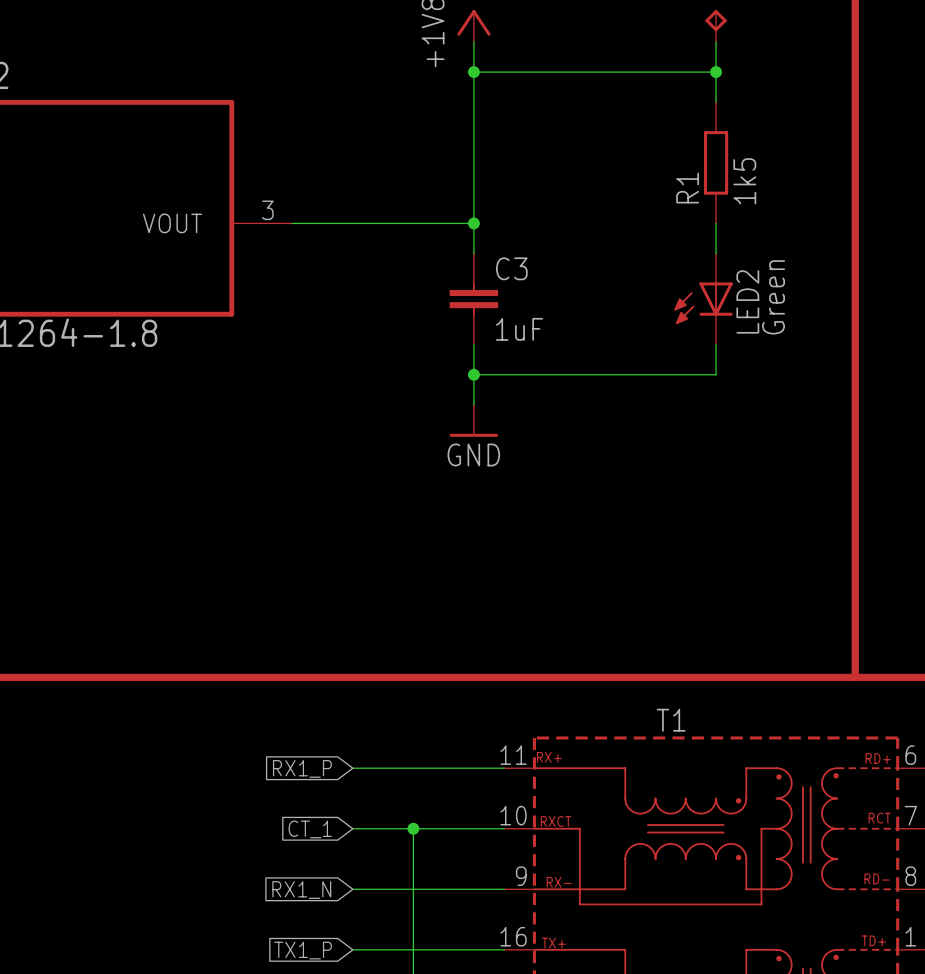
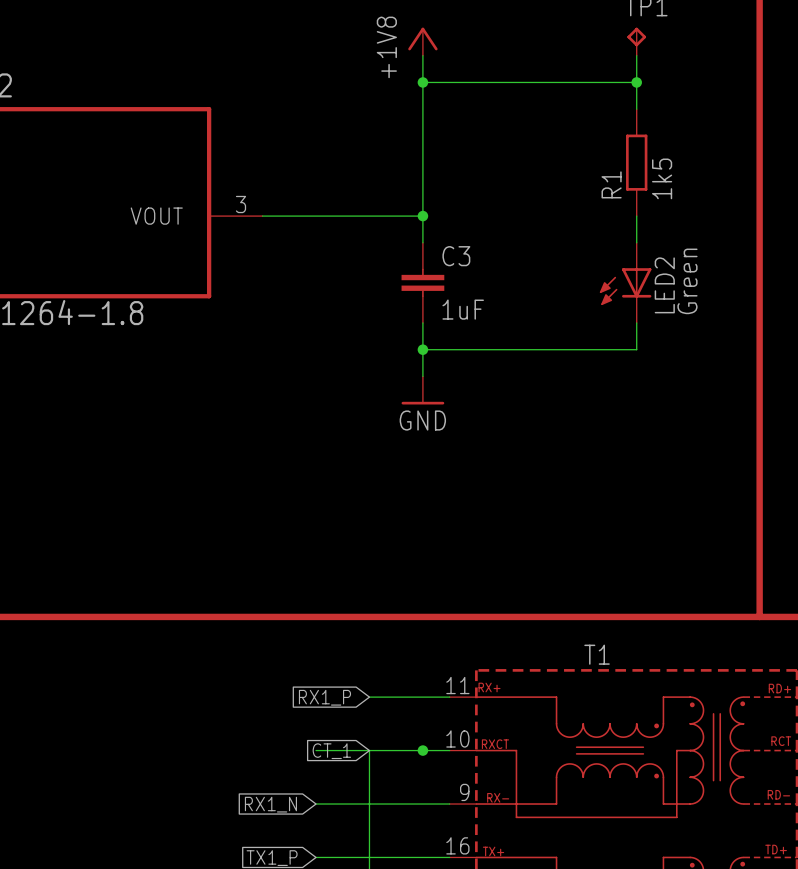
global label position: RX1_P (302, 768) -> RX1_P (324, 697)
wire: (352, 768) (413, 768) -> none
junction position: (413, 828) -> (422, 750)
global label position: CT_1 (310, 829) -> CT_1 (331, 751)

